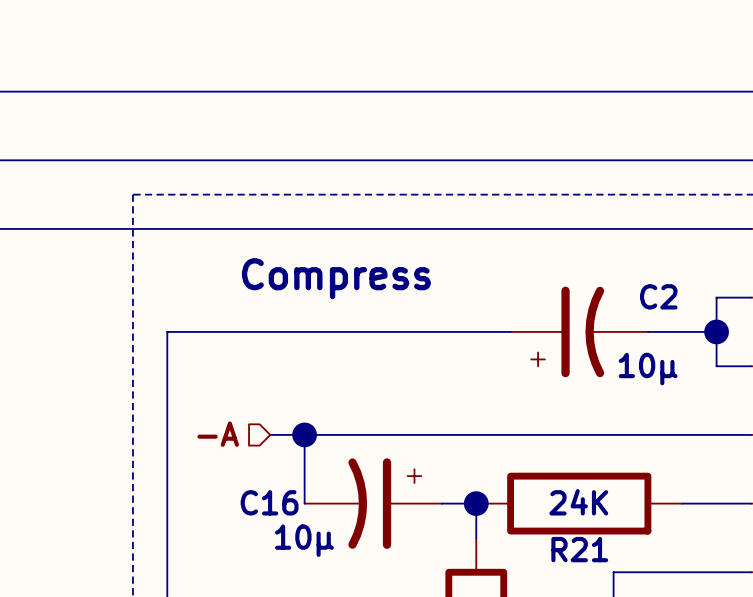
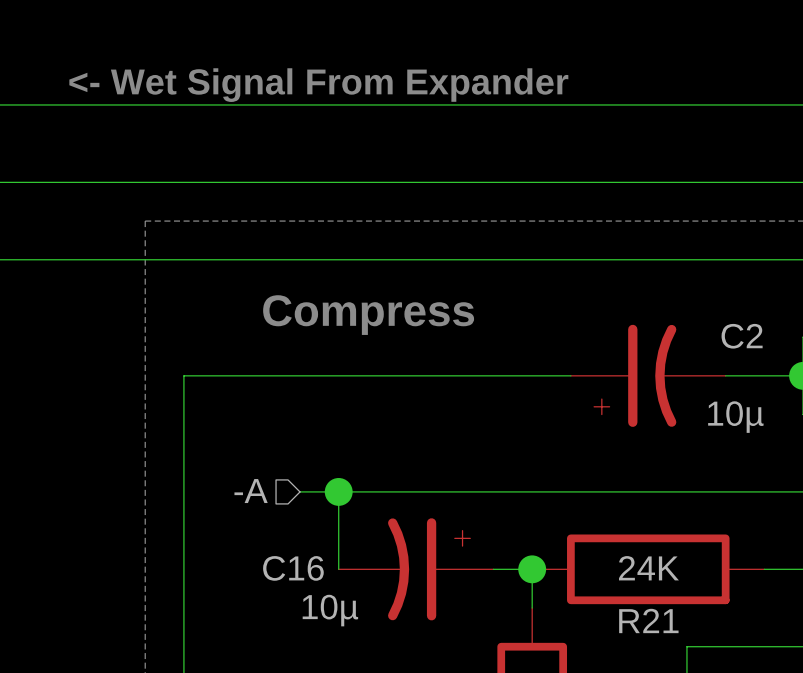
text: none -> <- Wet Signal From Expander (318, 85)

